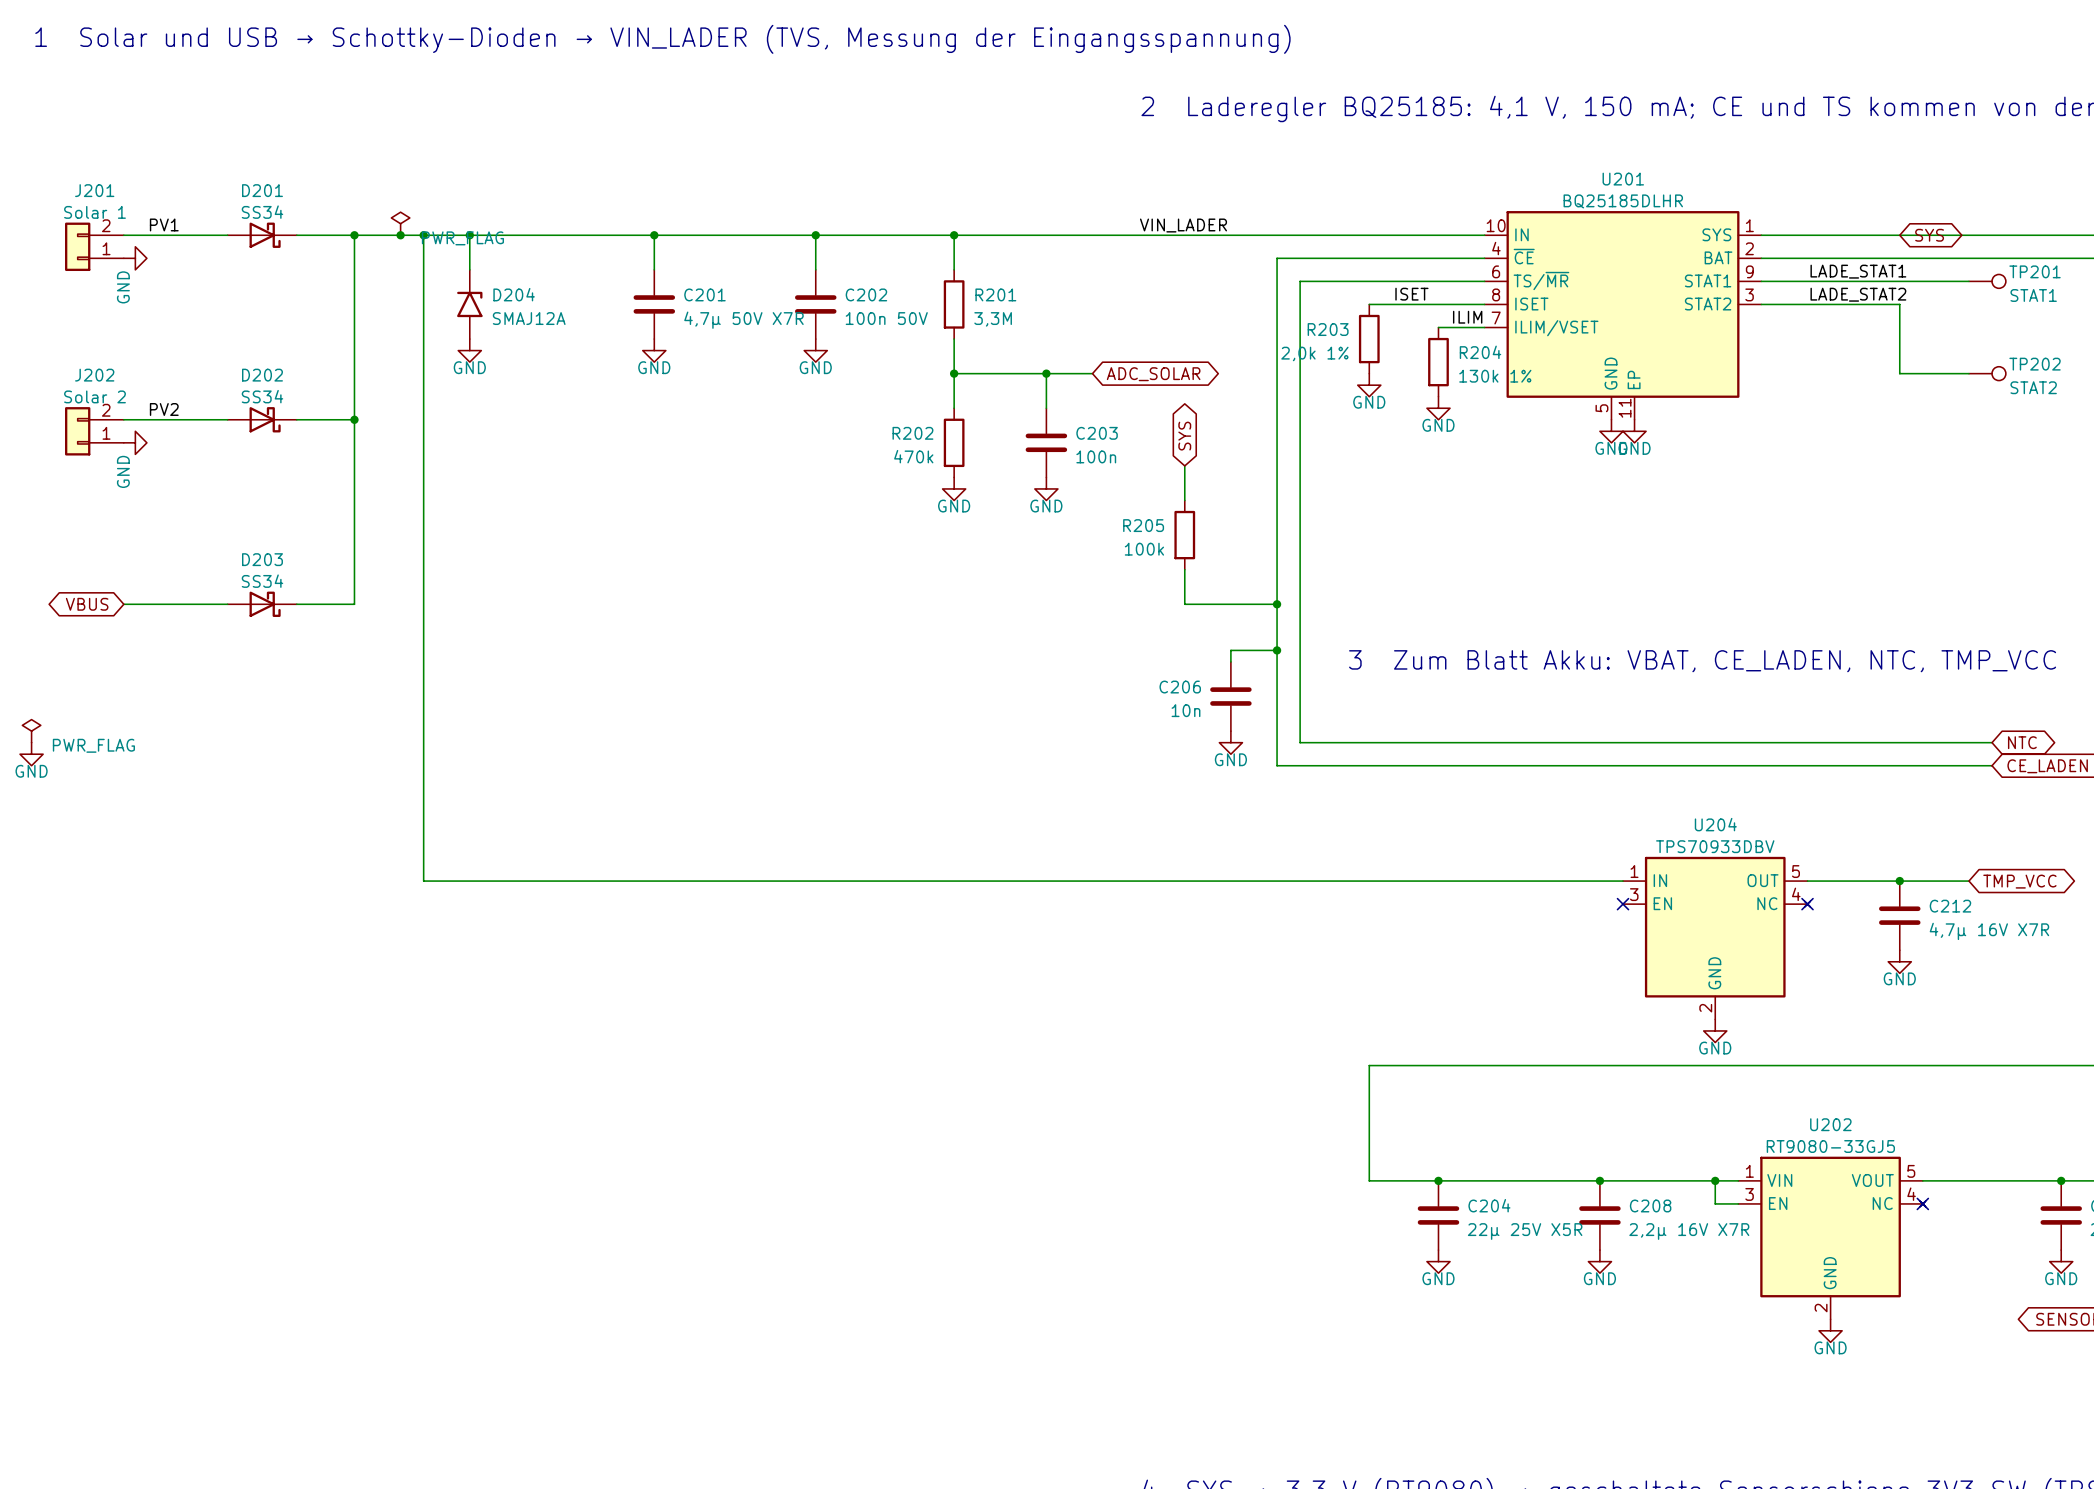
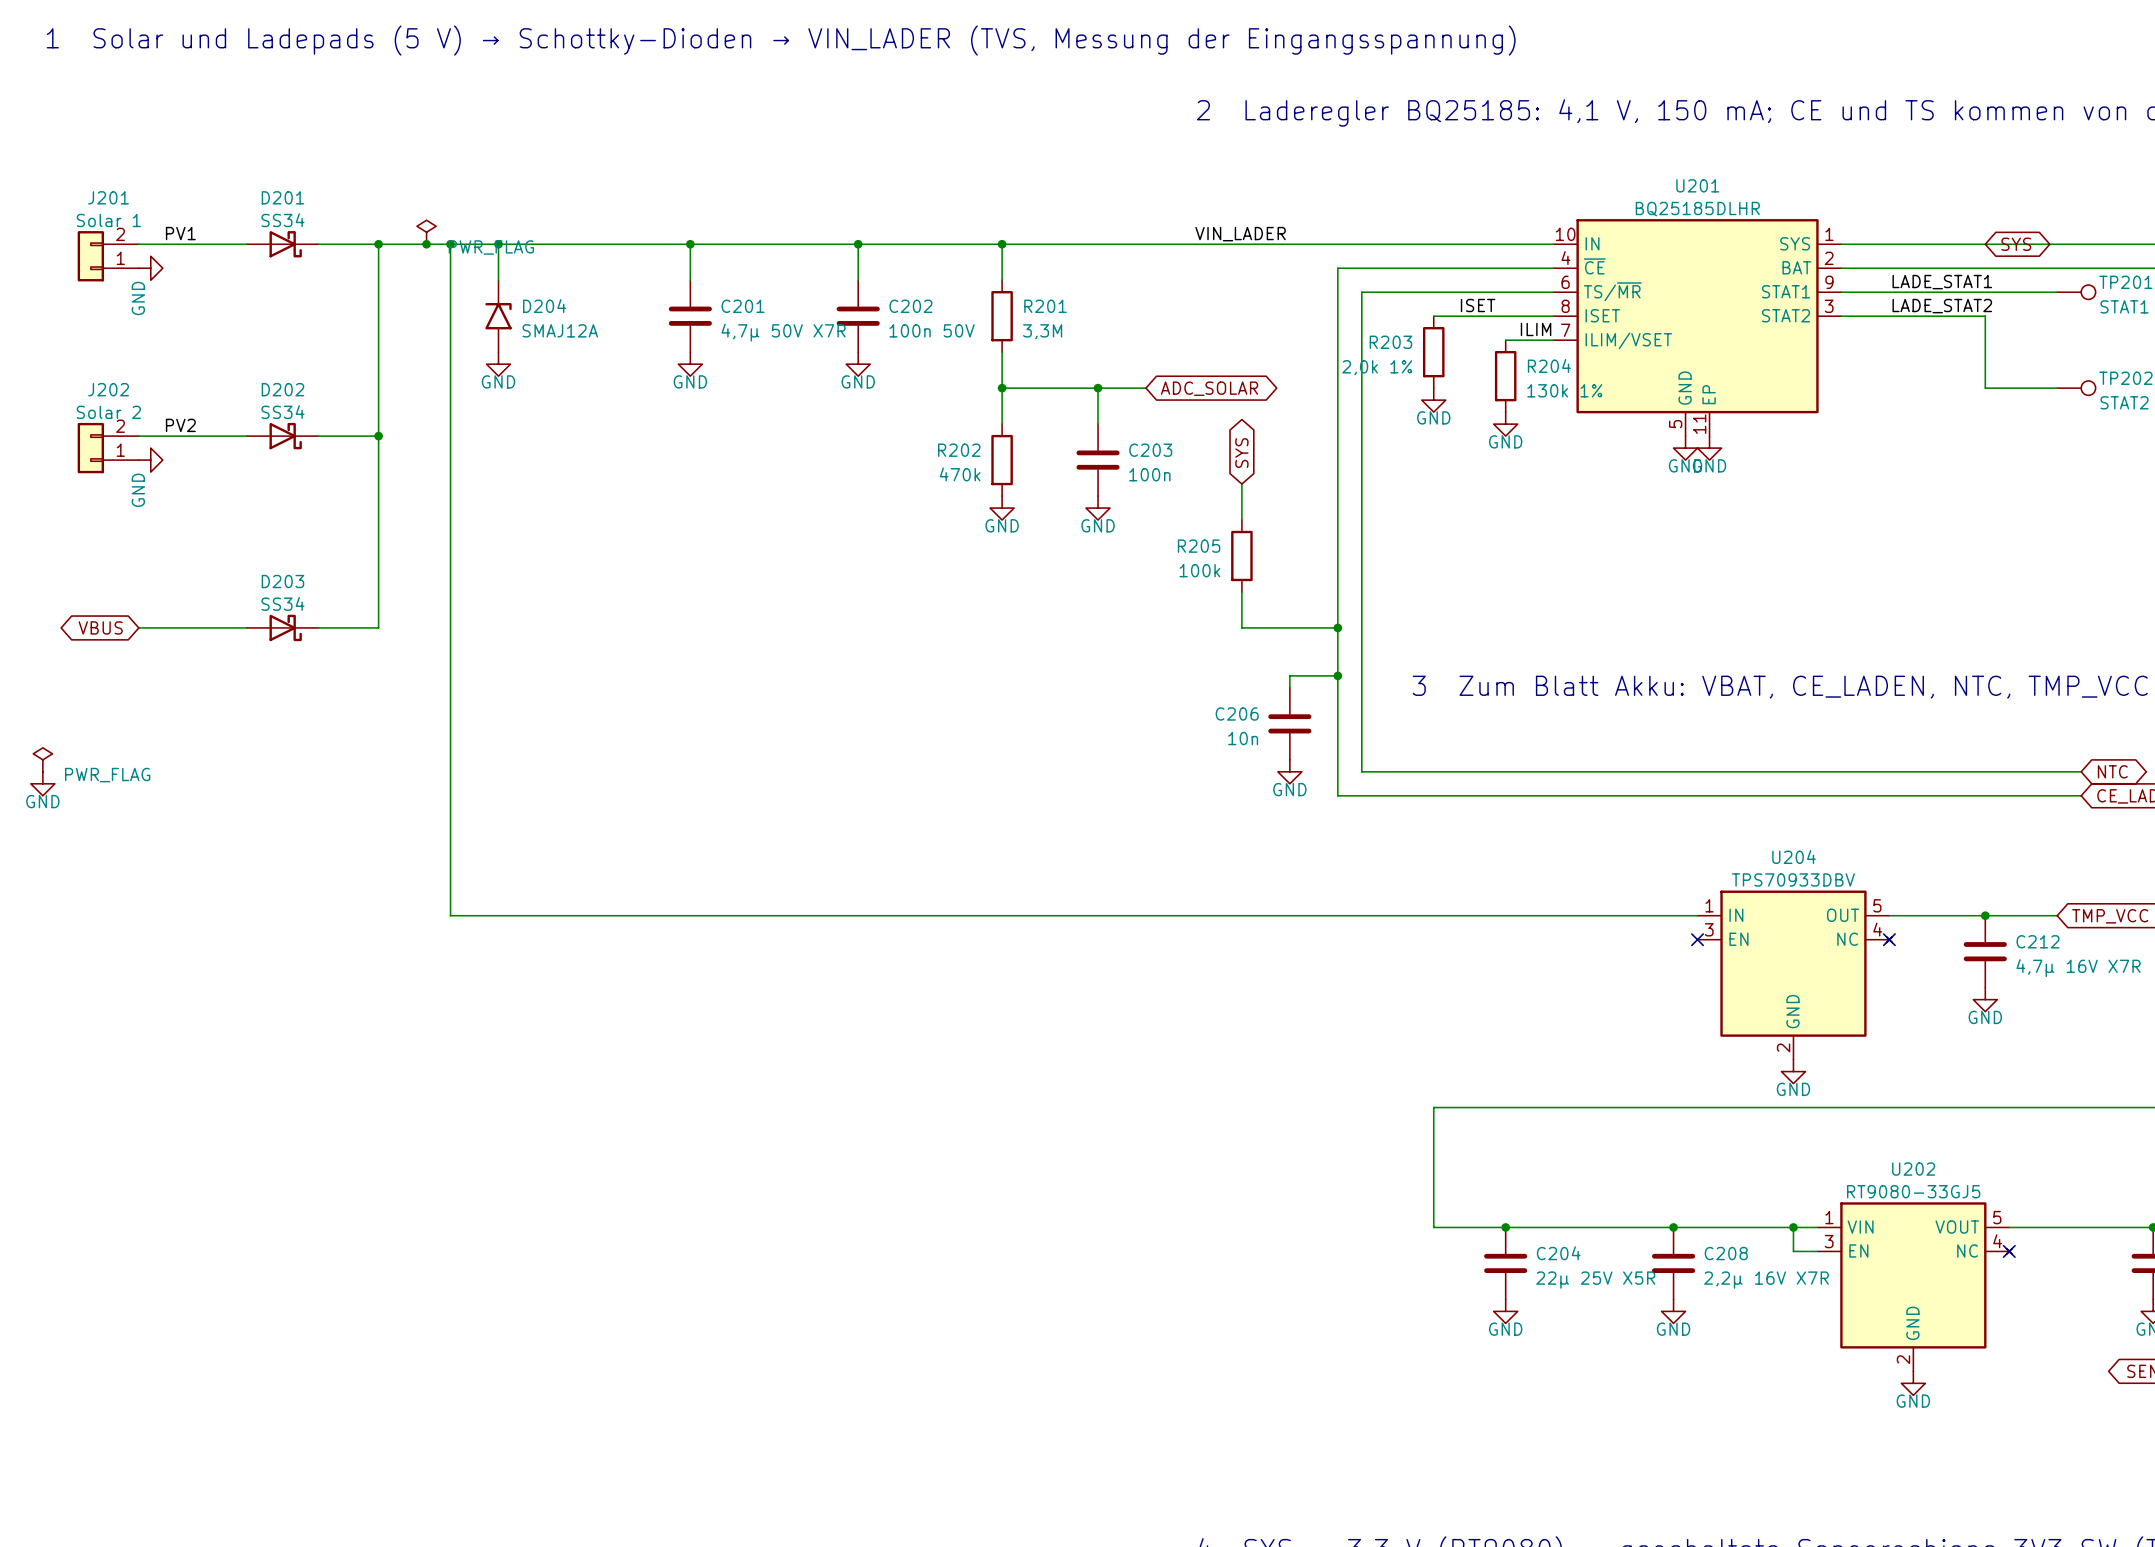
text: 1 Solar und USB → Schottky-Dioden → VIN_LADER (TVS, Messung der Eingangsspannung) (662, 39) -> 1 Solar und Ladepads (5 V) → Schottky-Dioden → VIN_LADER (TVS, Messung der Eingangsspannung) (781, 40)

